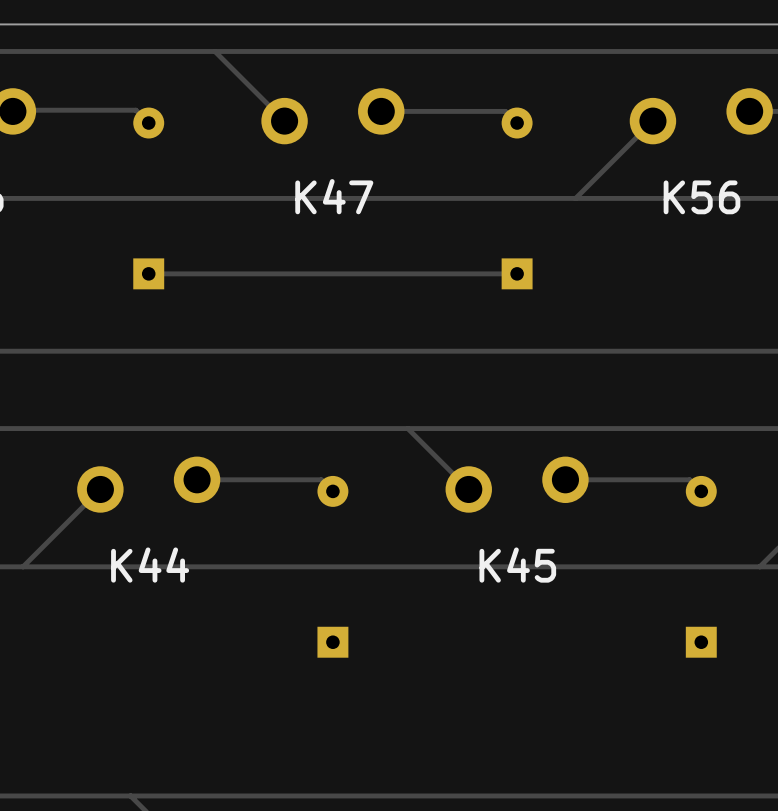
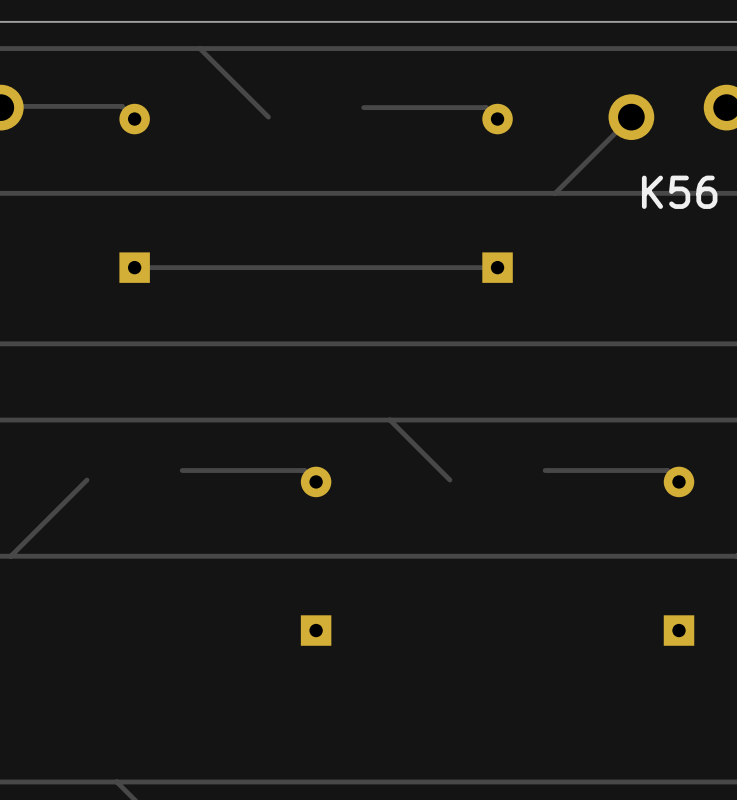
K47: (332, 116) -> none
K44: (148, 484) -> none
K45: (517, 484) -> none

